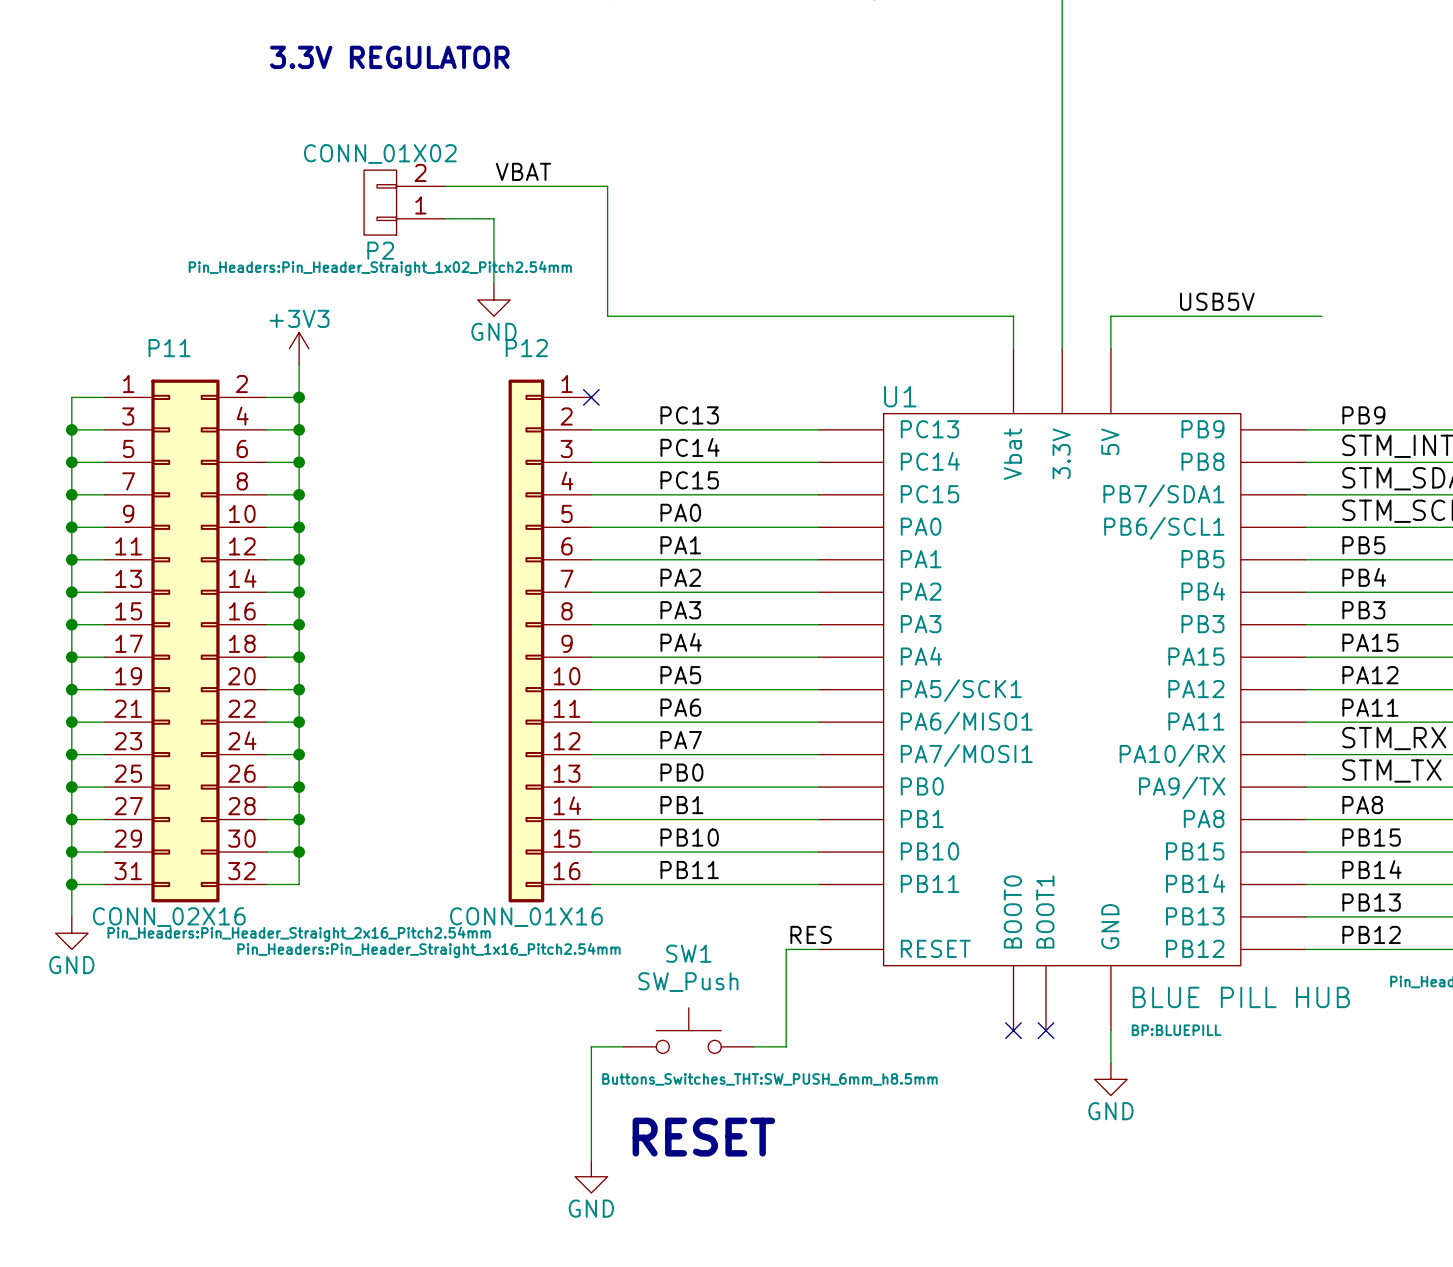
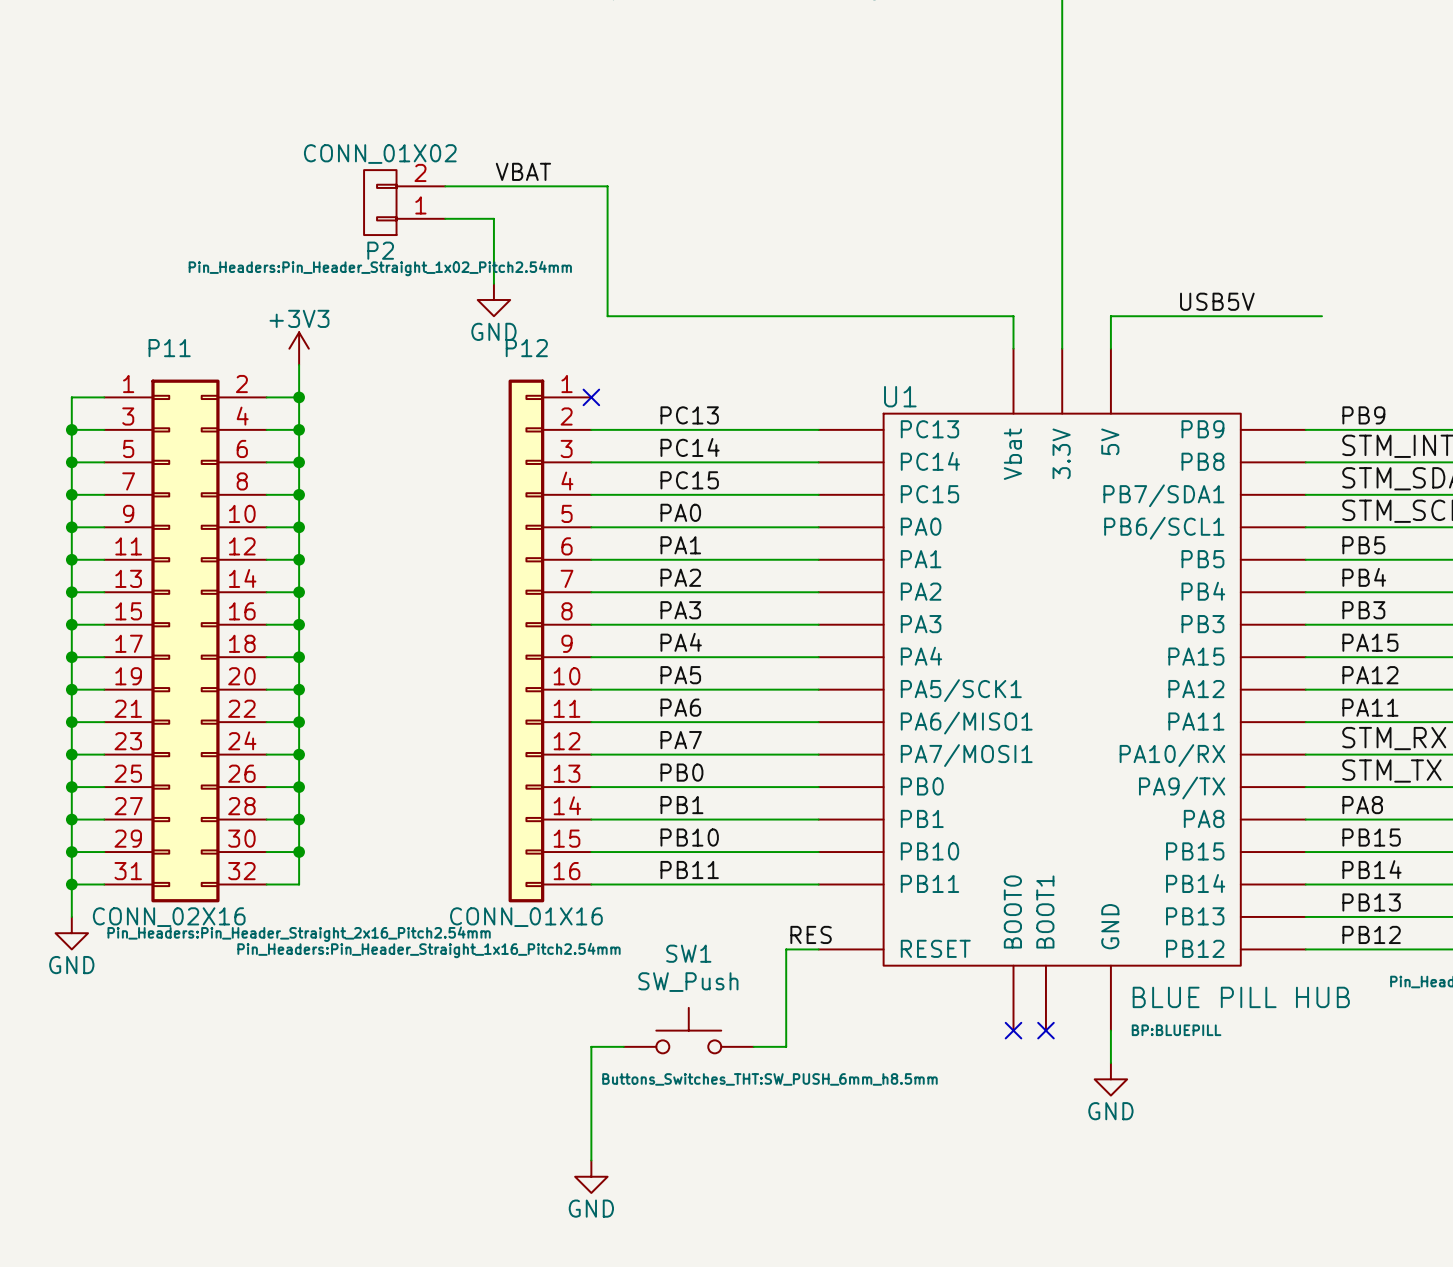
text: 3.3V REGULATOR (389, 57) -> none
text: RESET (703, 1137) -> none

